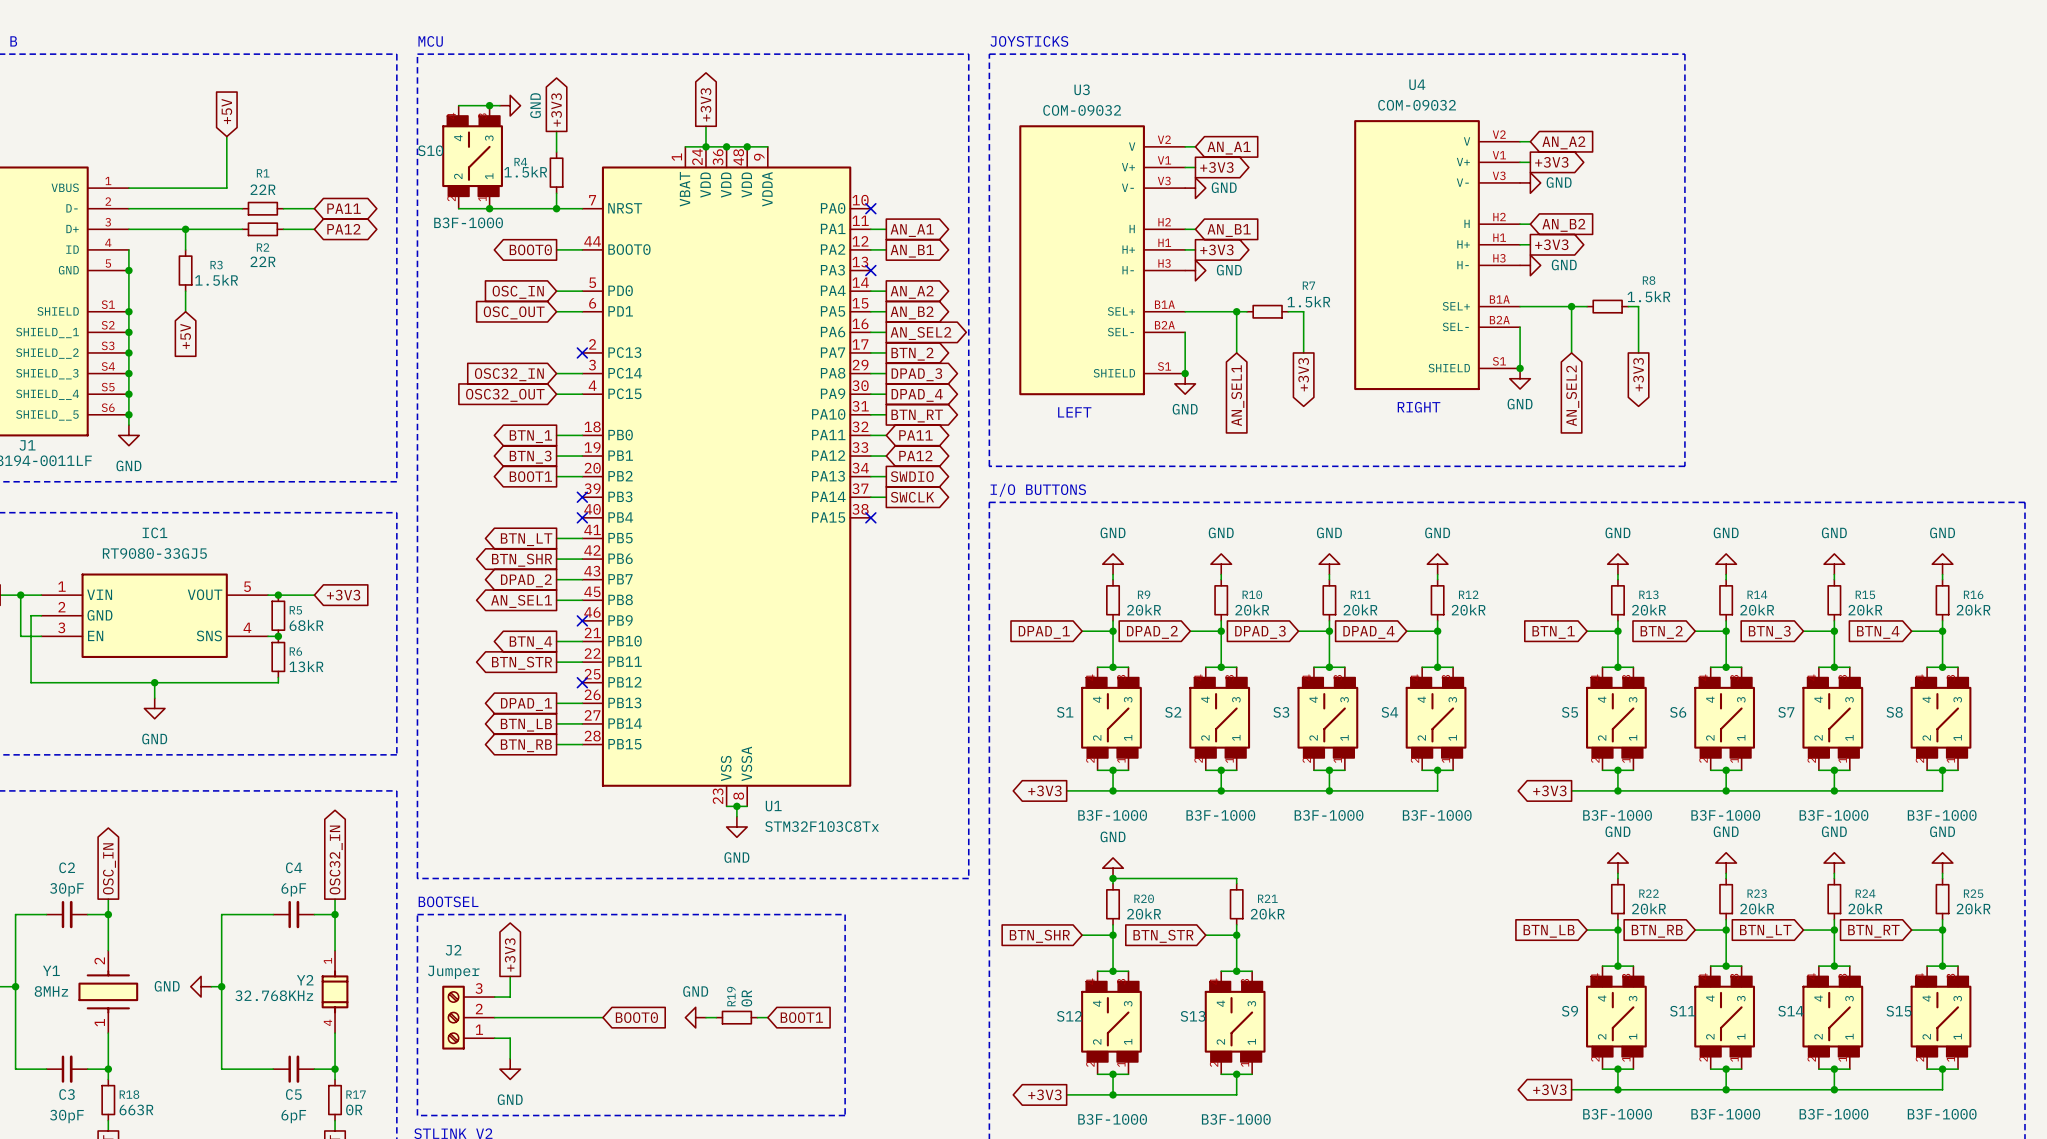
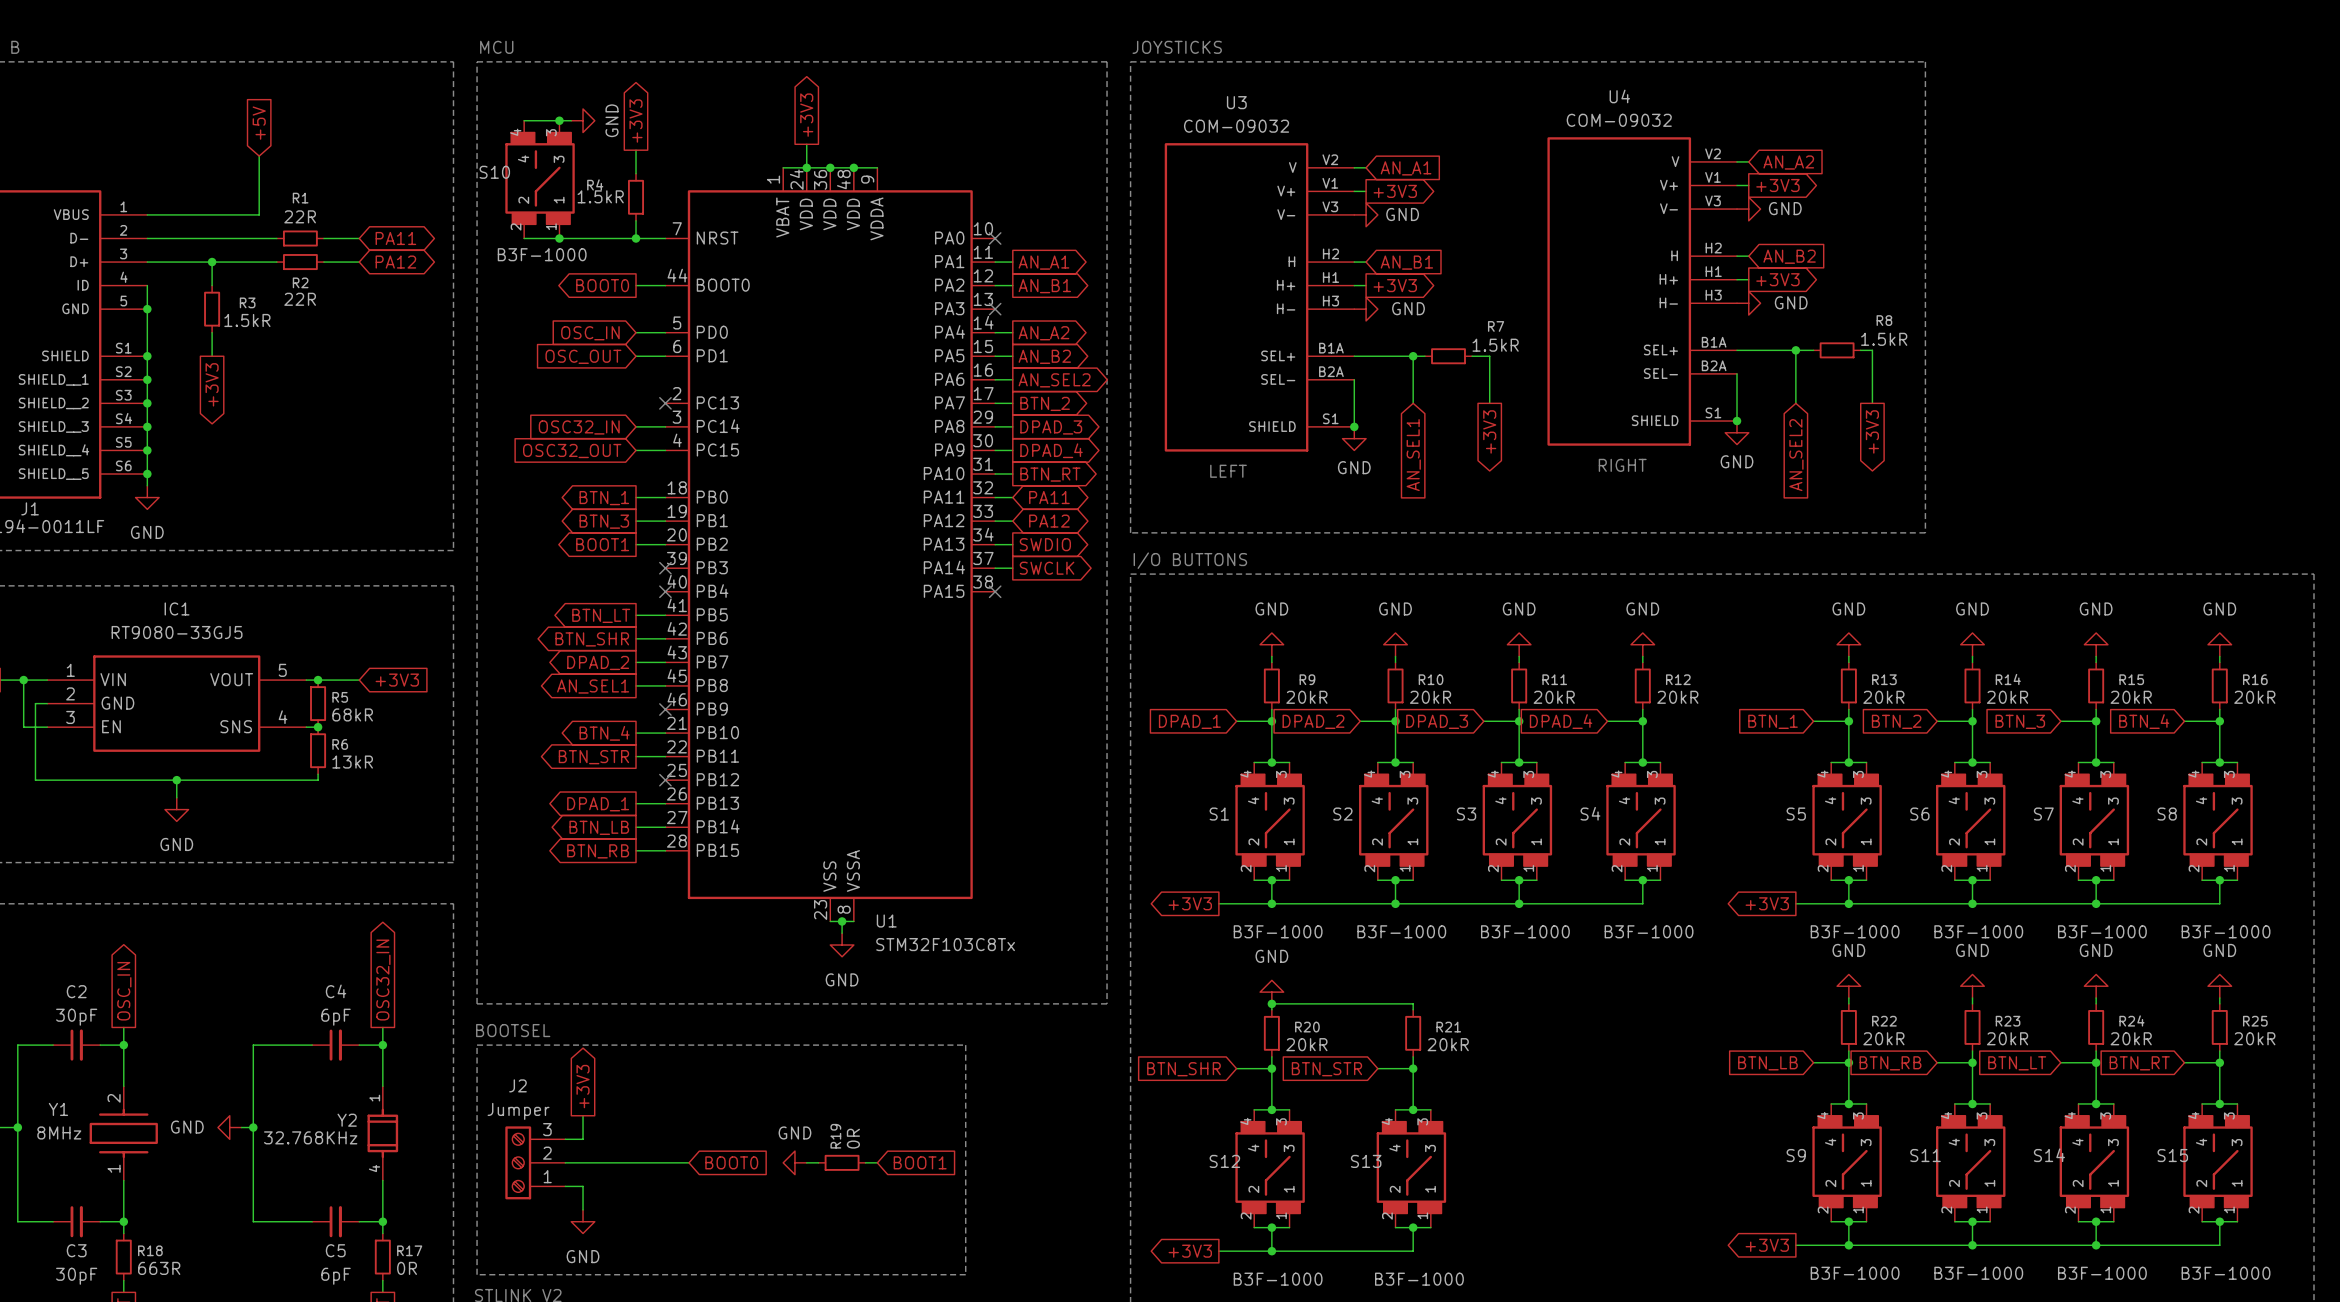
global label shape: input (185, 336) -> output (212, 384)
global label: +5V (185, 336) -> +3V3 (212, 384)

